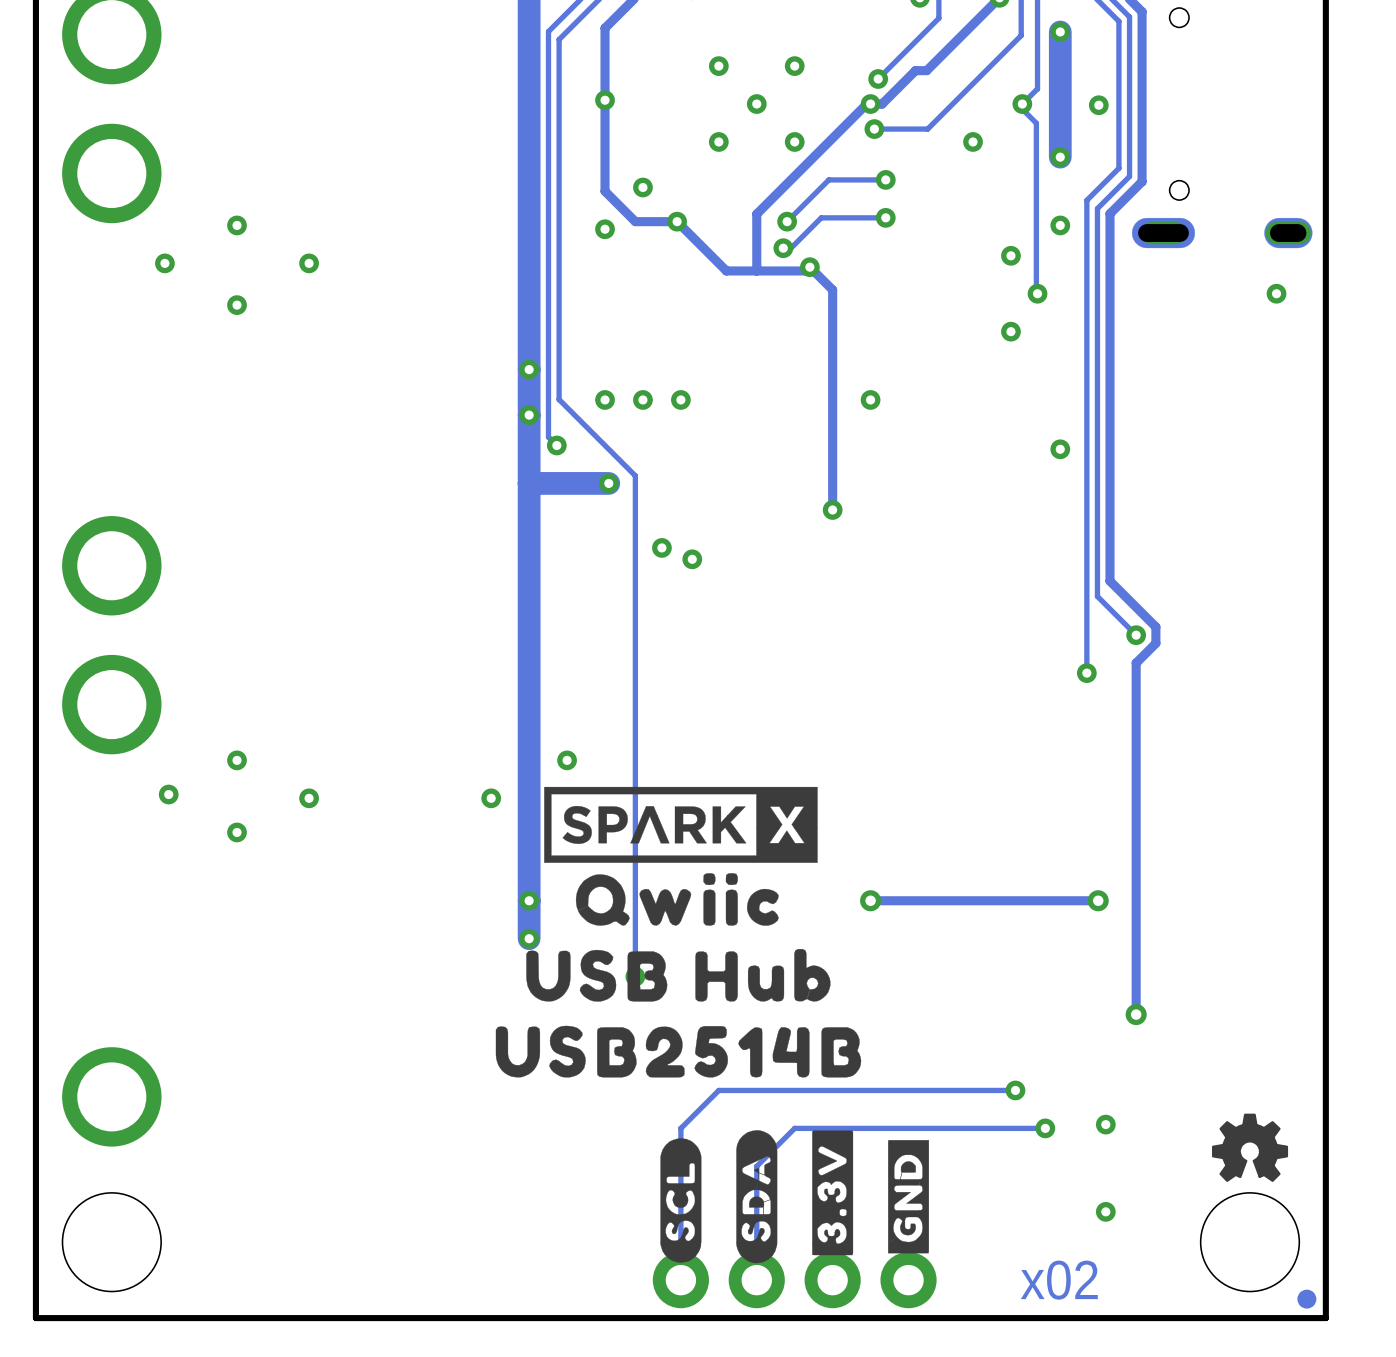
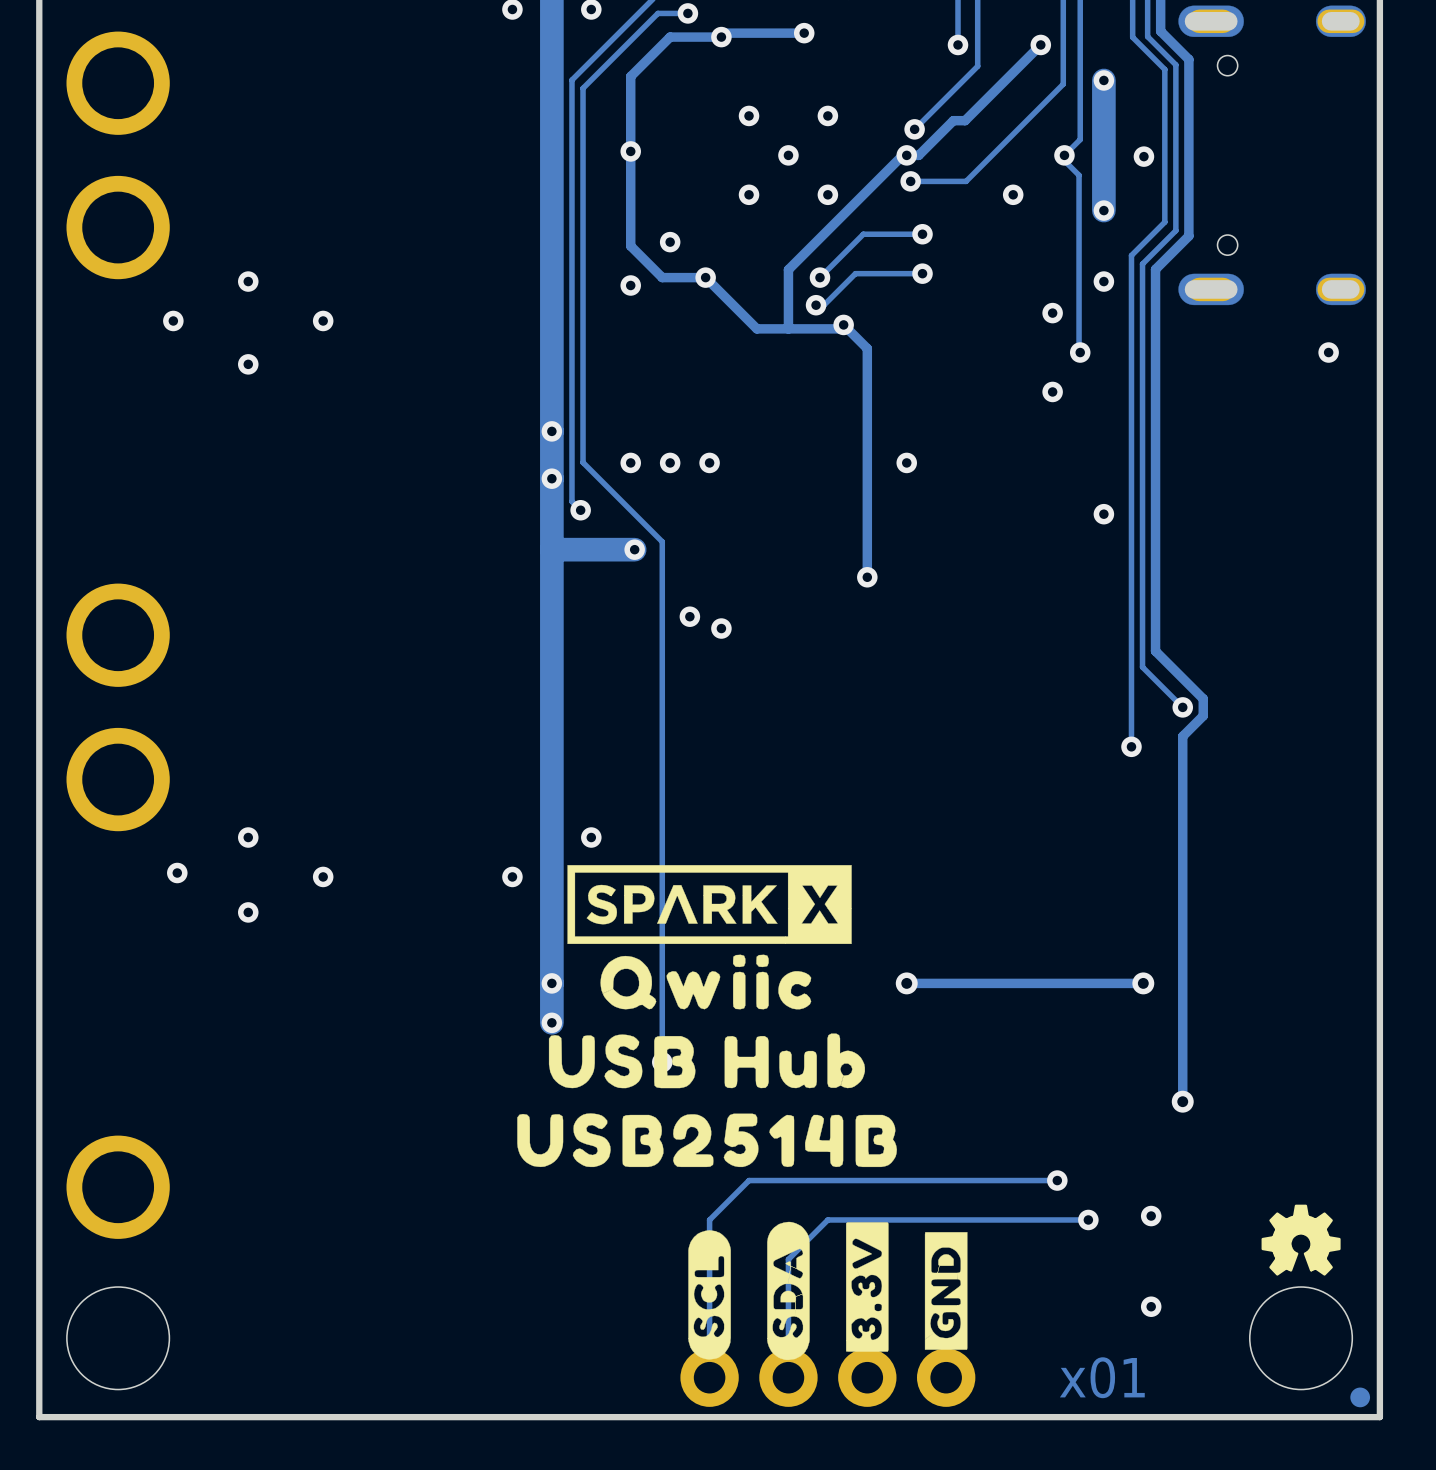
text: x02 (1059, 1280) -> x01 (1102, 1377)

